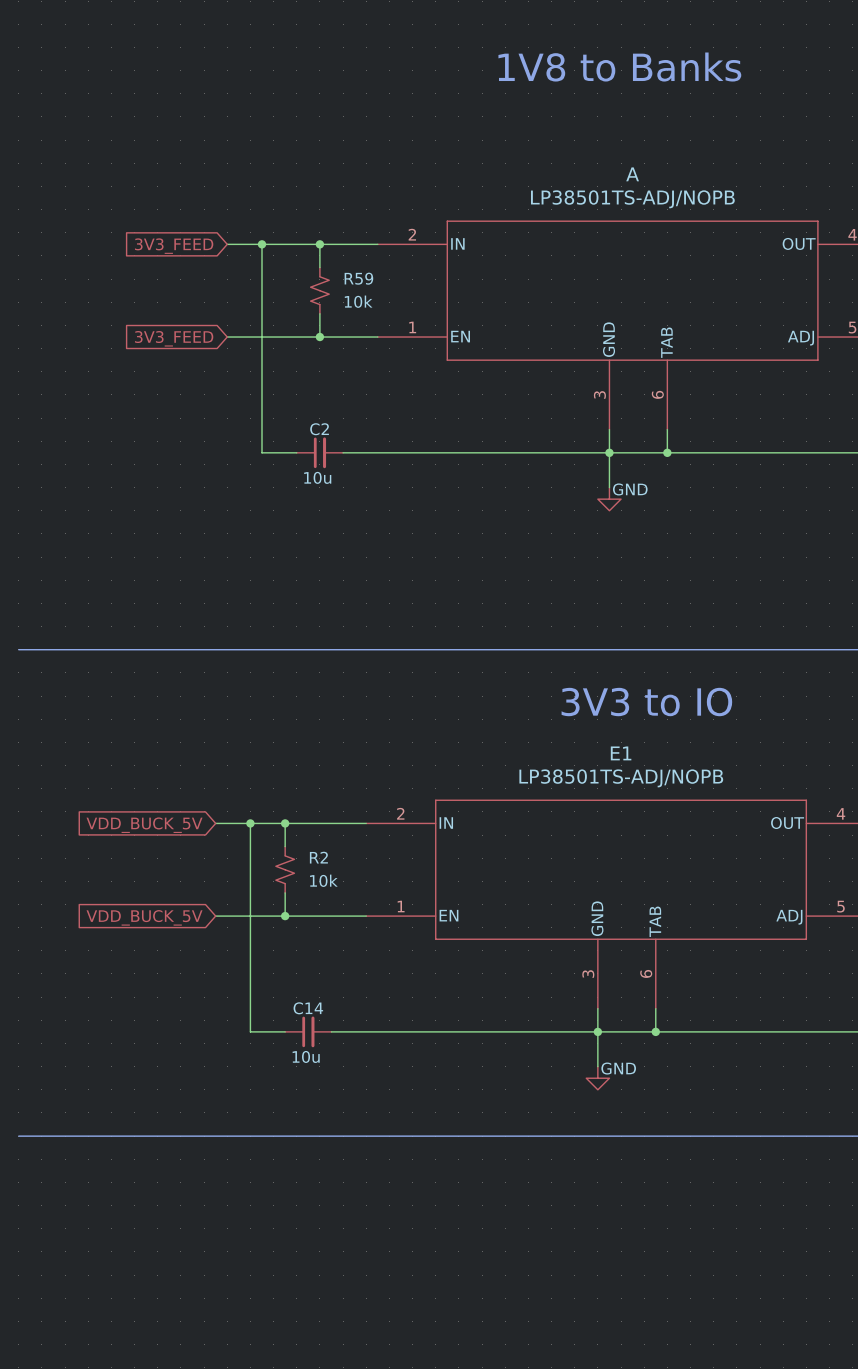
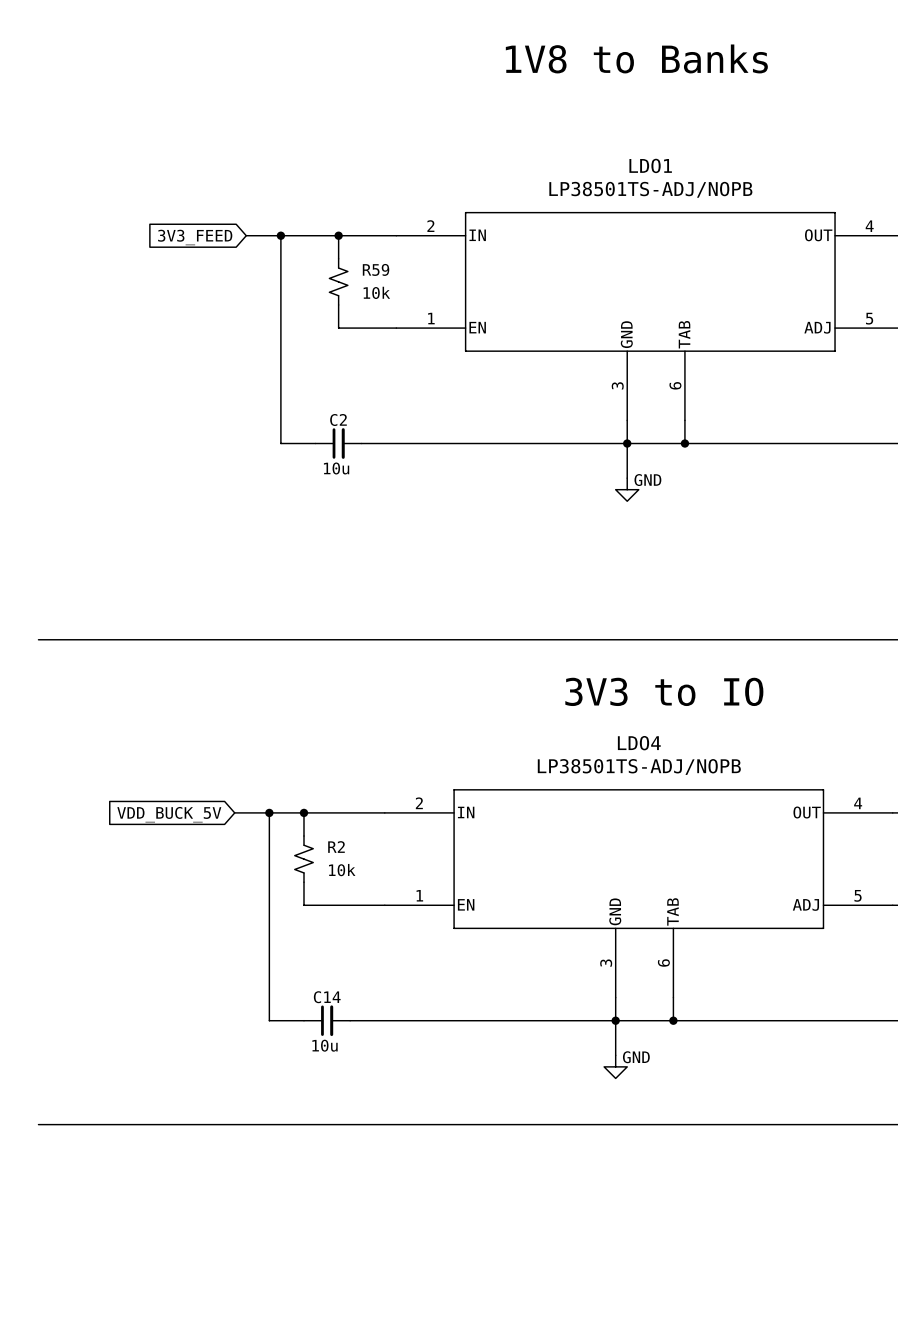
A name: A (632, 174) -> LDO1 (650, 165)
wire: (227, 337) (319, 337) -> none
junction: (319, 337) -> none
global label: 3V3_FEED (174, 338) -> none
E1 name: E1 (621, 753) -> LDO4 (639, 743)
wire: (215, 916) (285, 916) -> none
junction: (285, 916) -> none
global label: VDD_BUCK_5V (144, 917) -> none

